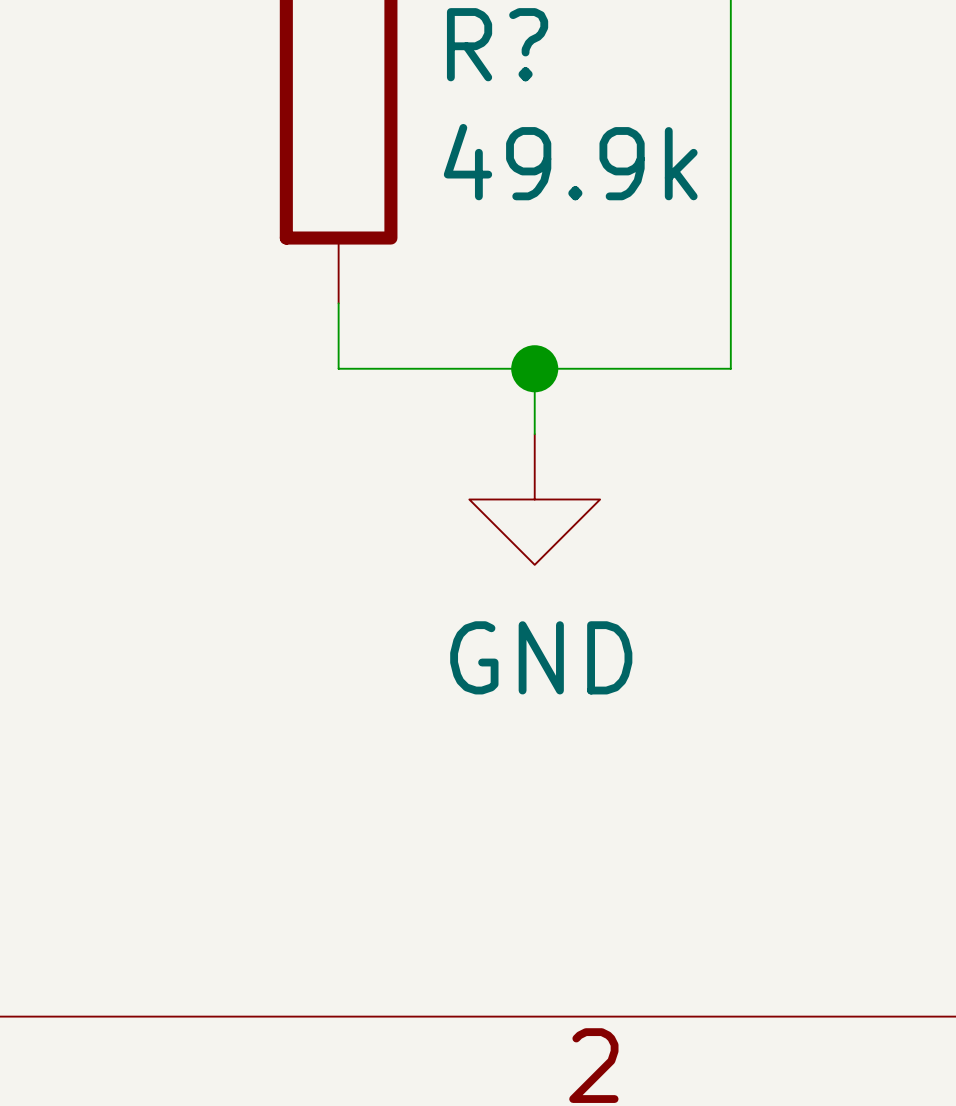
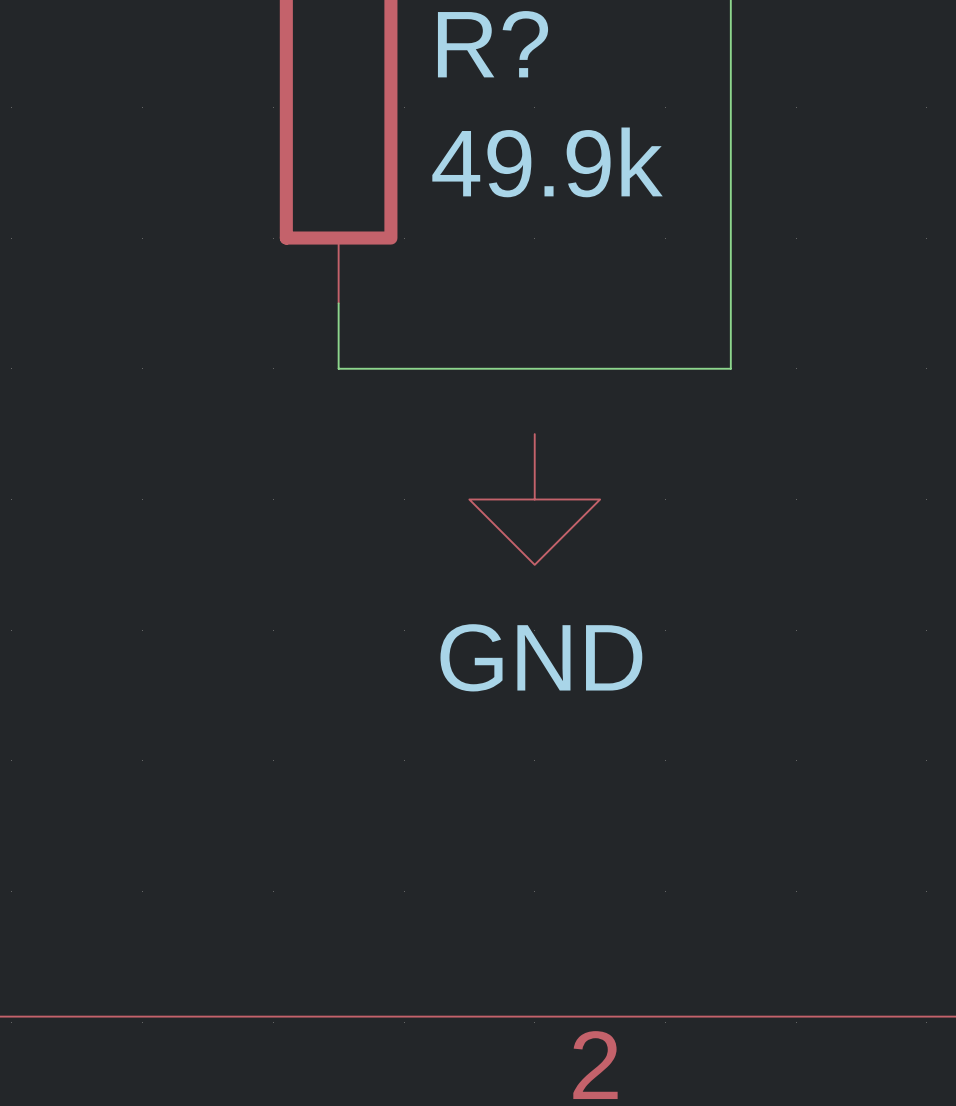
wire: (534, 368) (534, 434) -> none
junction: (534, 368) -> none

